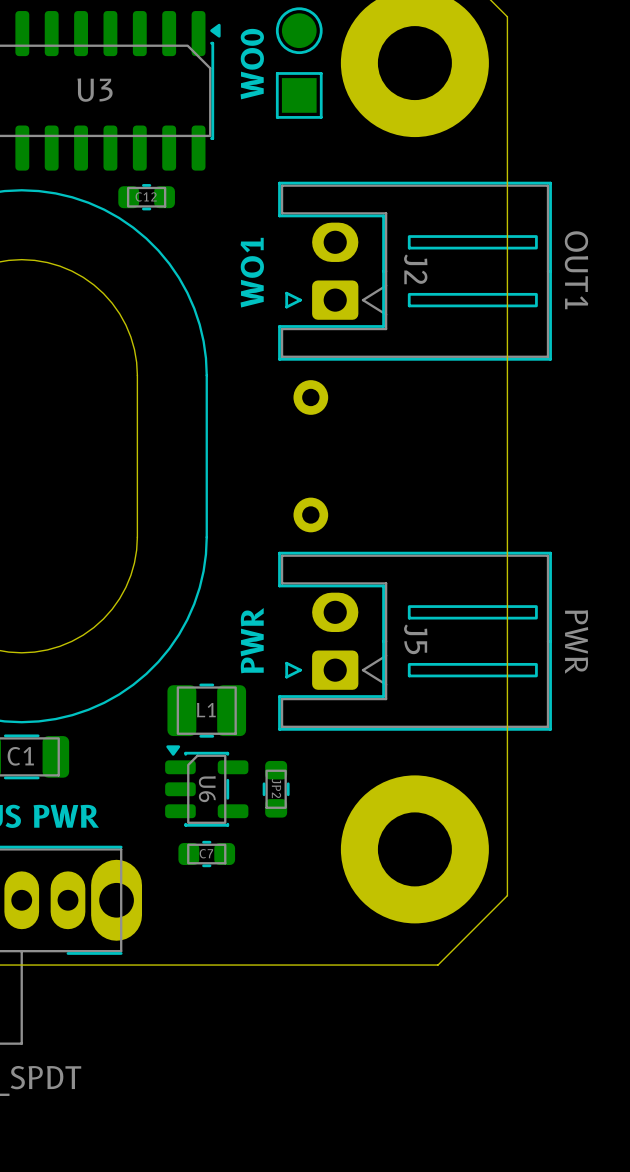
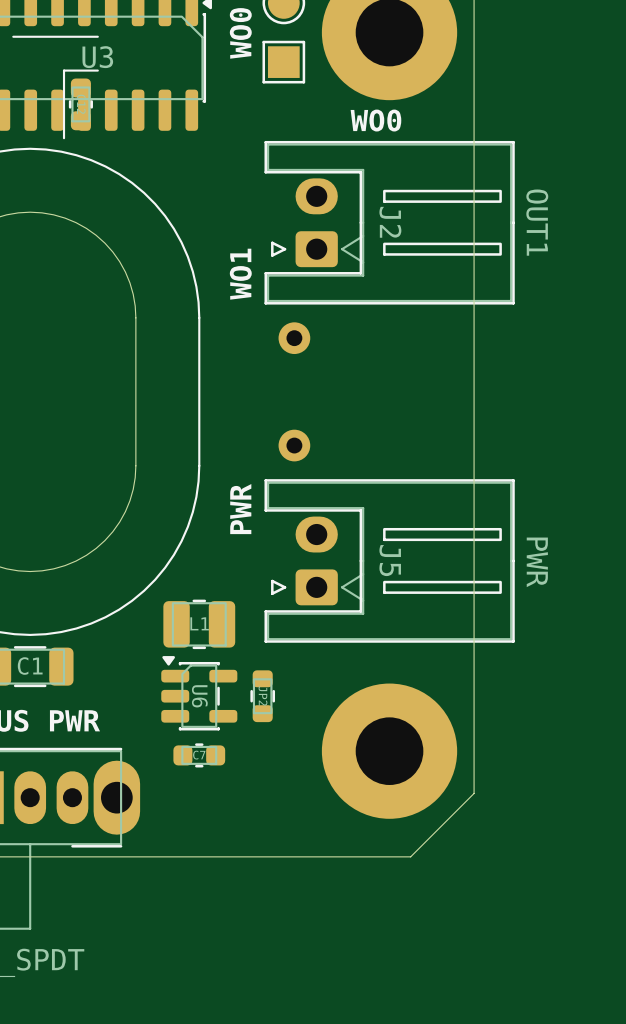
line: none -> (97, 36) (13, 36)
line: none -> (97, 70) (64, 70) (64, 138)
text: none -> WO0 (375, 120)
C12 rotation: 0° (146, 197) -> 90° clockwise (80, 104)
C12 position: (146, 197) -> (80, 104)
text position: WO1 (252, 272) -> WO1 (240, 274)
text position: PWR (252, 640) -> PWR (240, 509)

